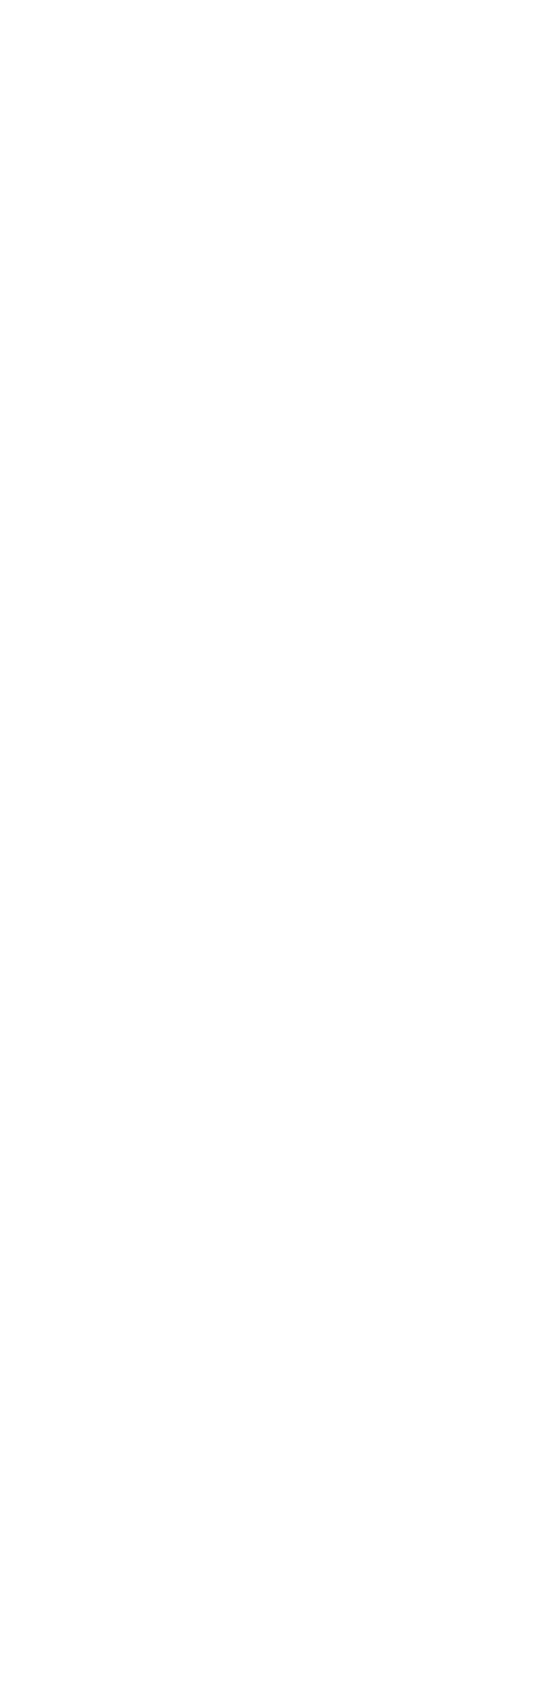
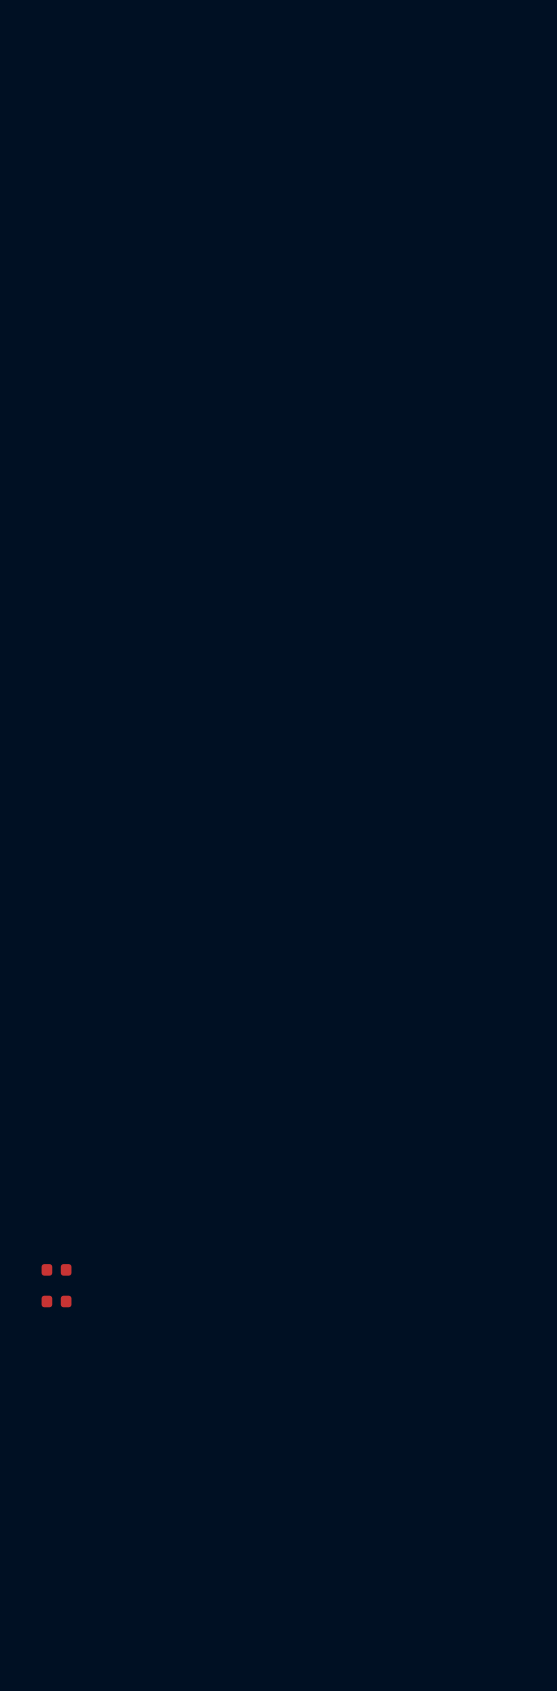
part: none -> (56, 1269)
part: none -> (56, 1301)

